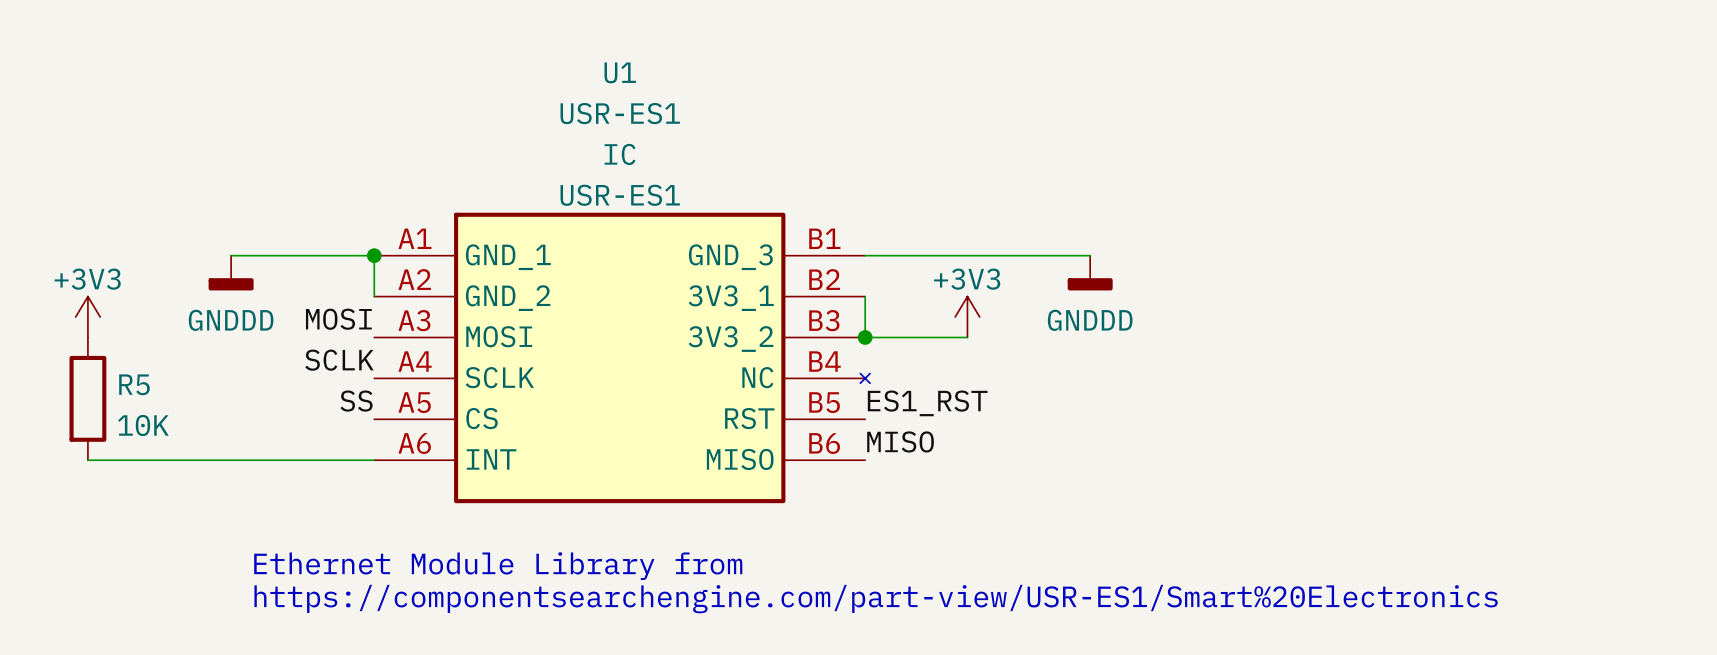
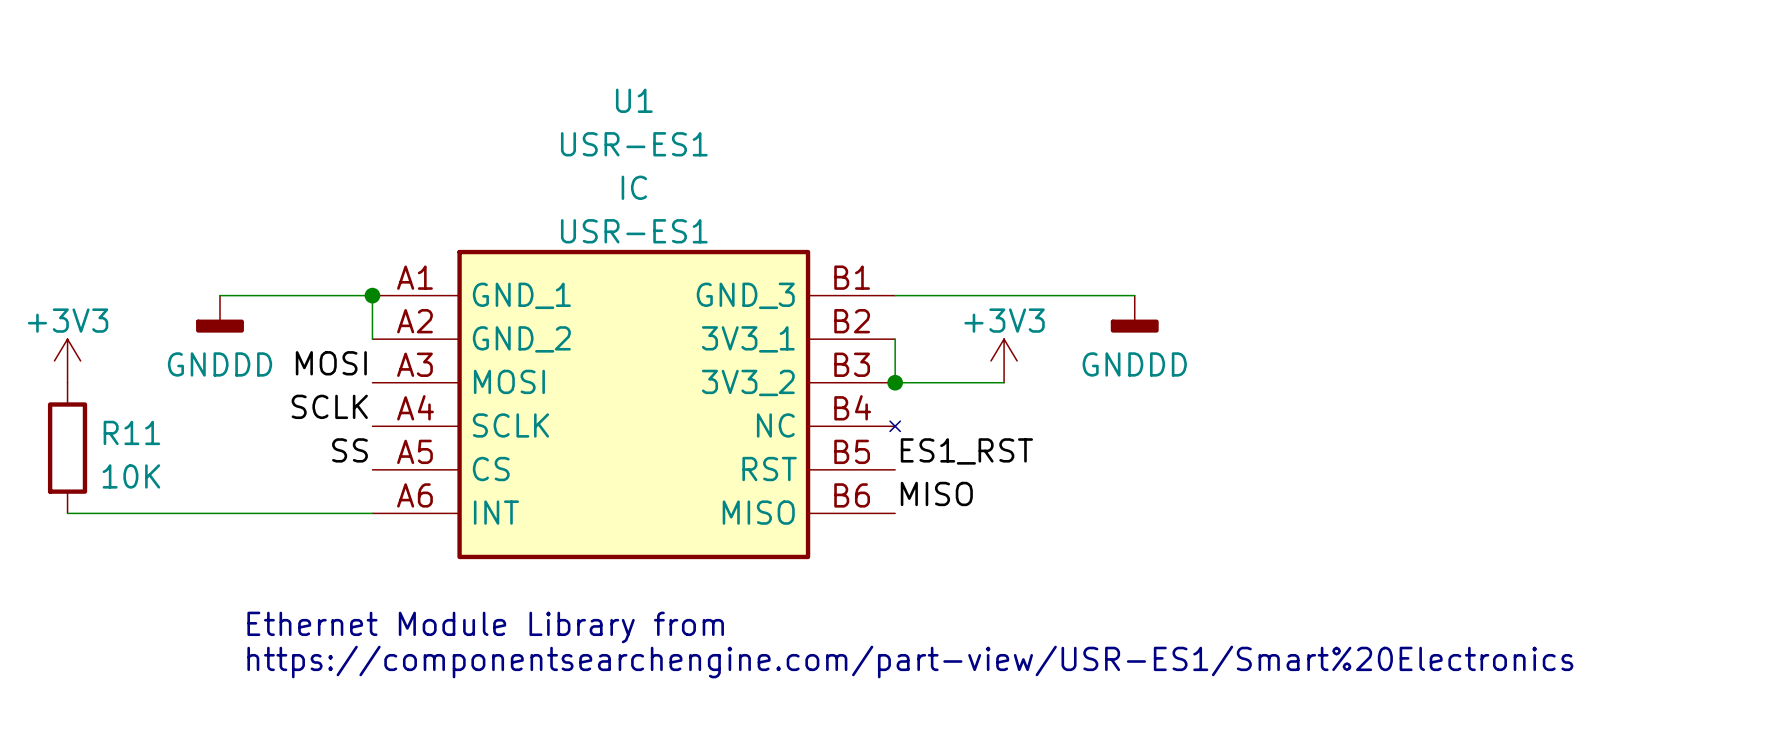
R5 name: R5 (134, 384) -> R11 (131, 432)

